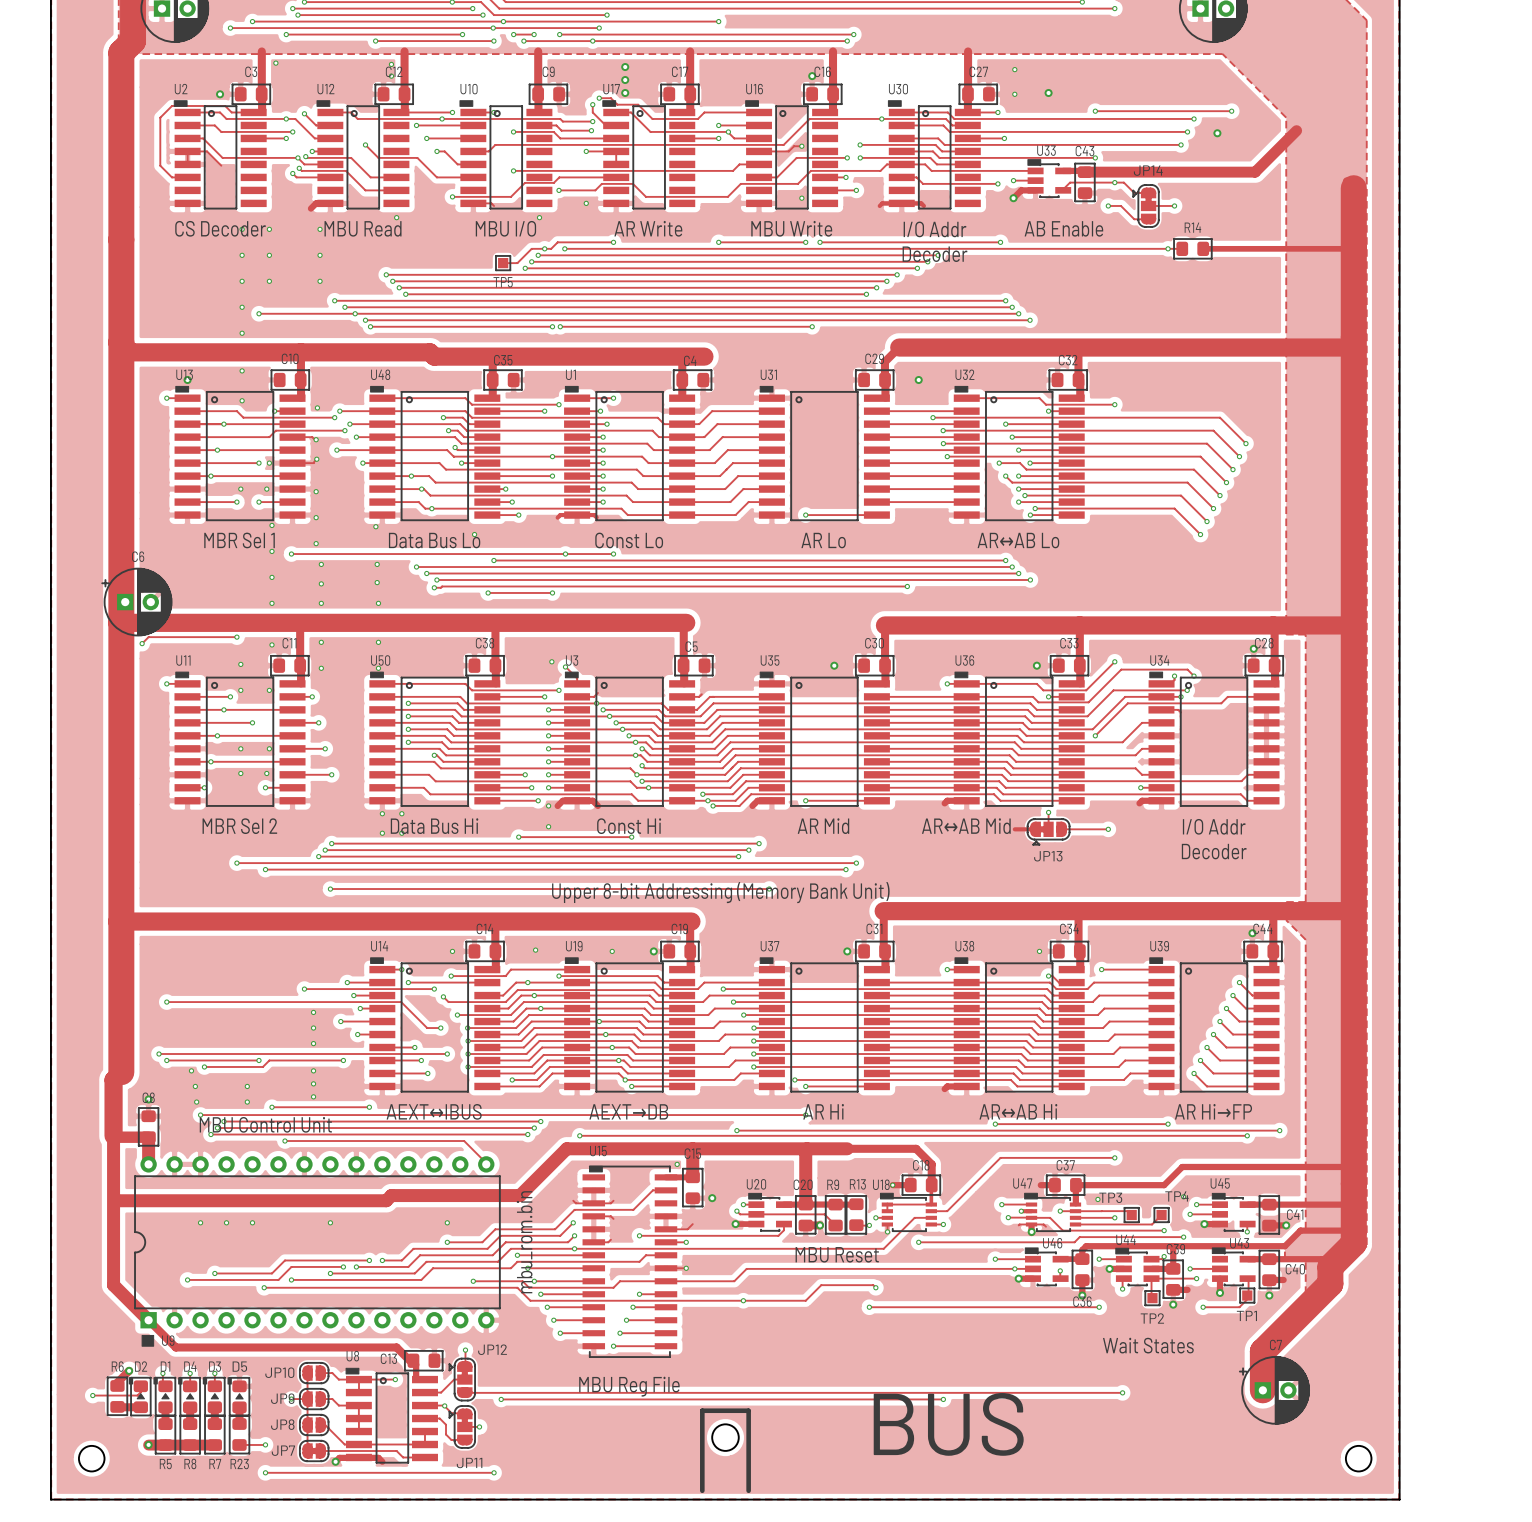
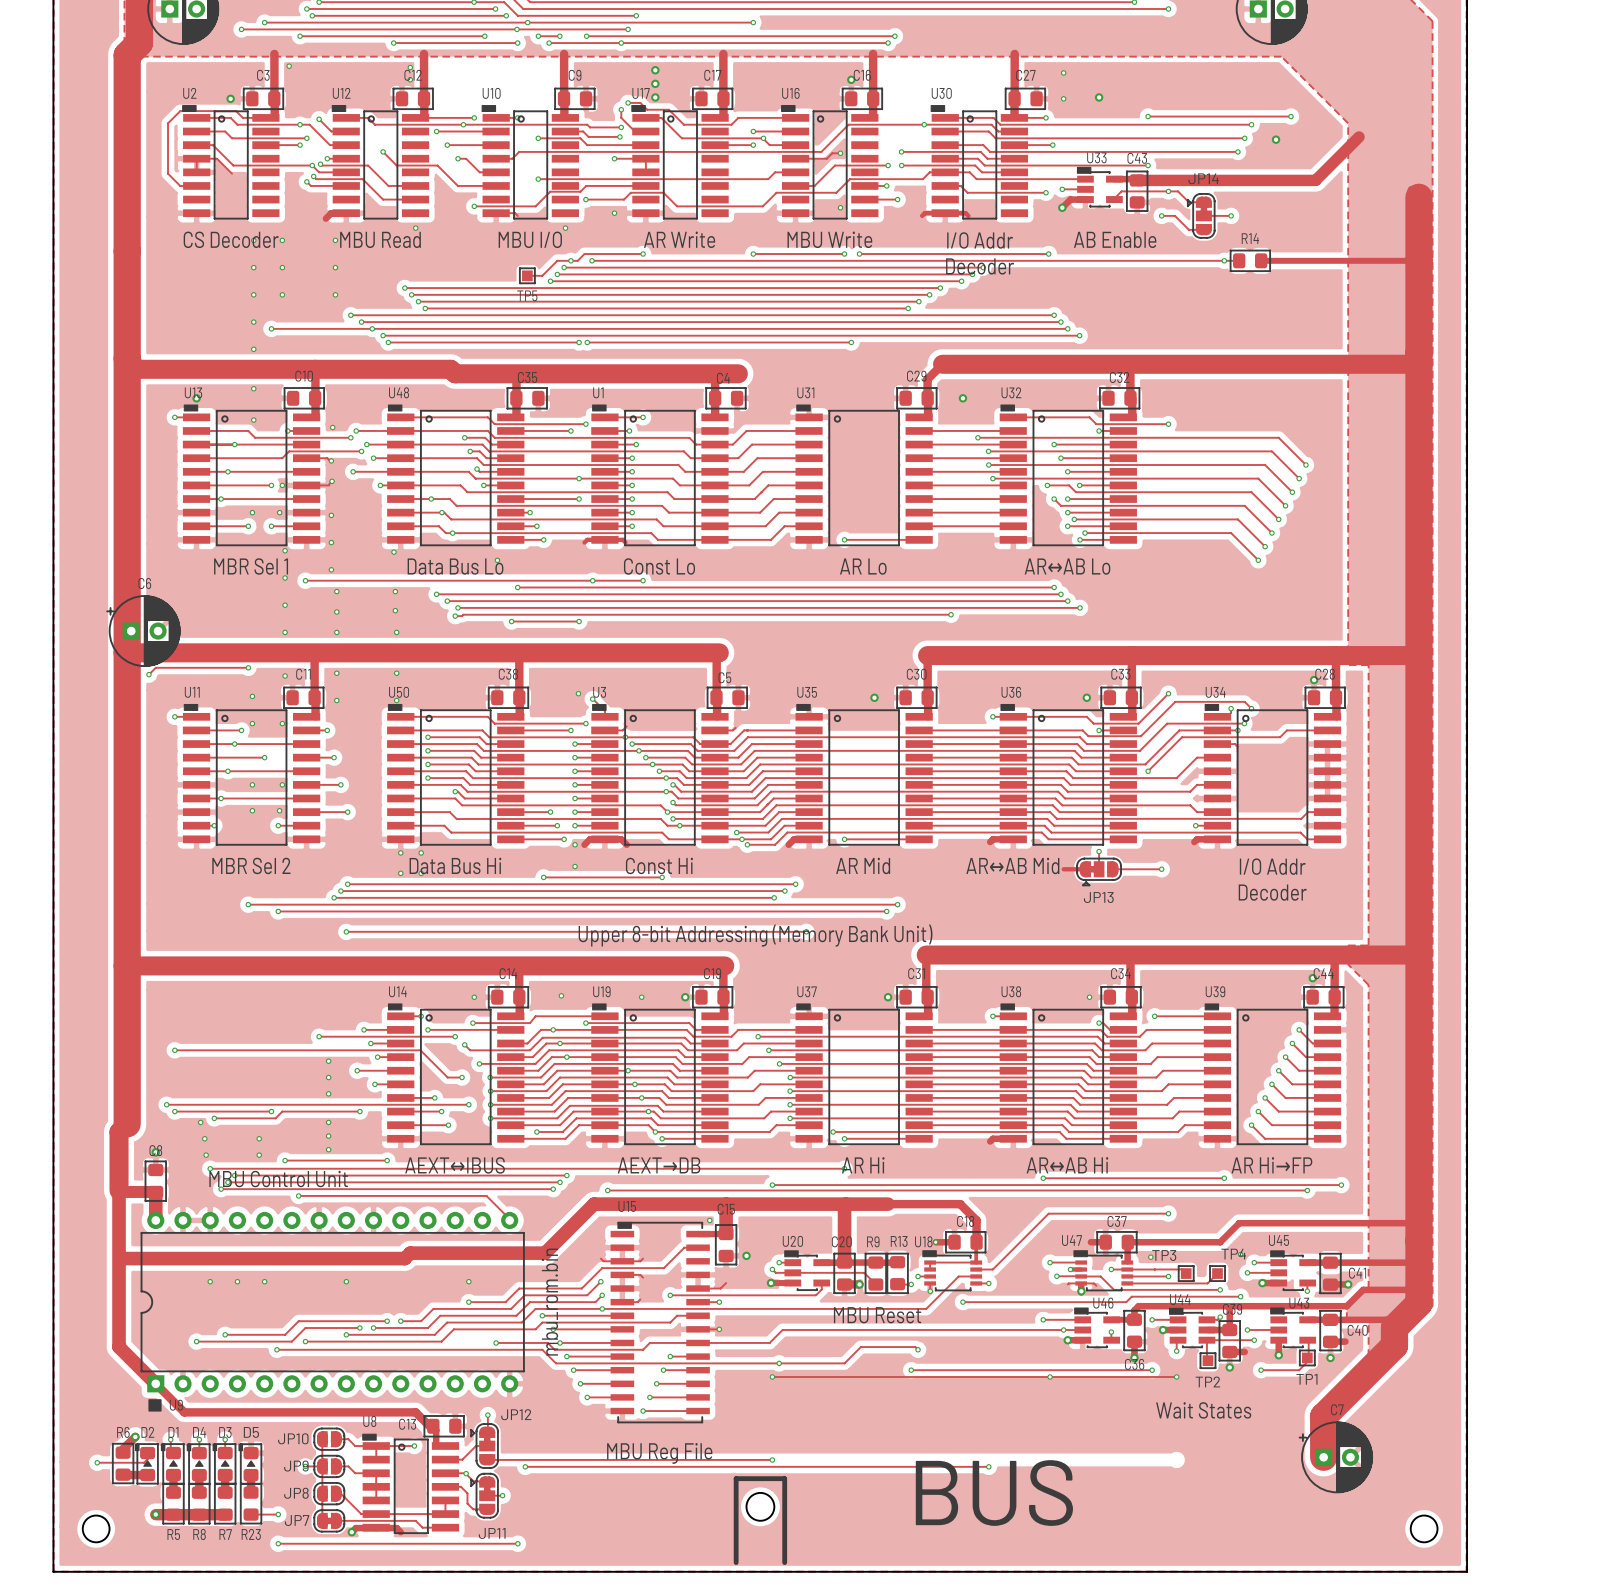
via: none -> (772, 1377)
via: none -> (1050, 1377)
via: none -> (1176, 1377)
track: (736, 1392) (1122, 1392) -> (772, 1377) (1176, 1377)
via: none -> (772, 1460)
via: (1122, 1392) -> none

